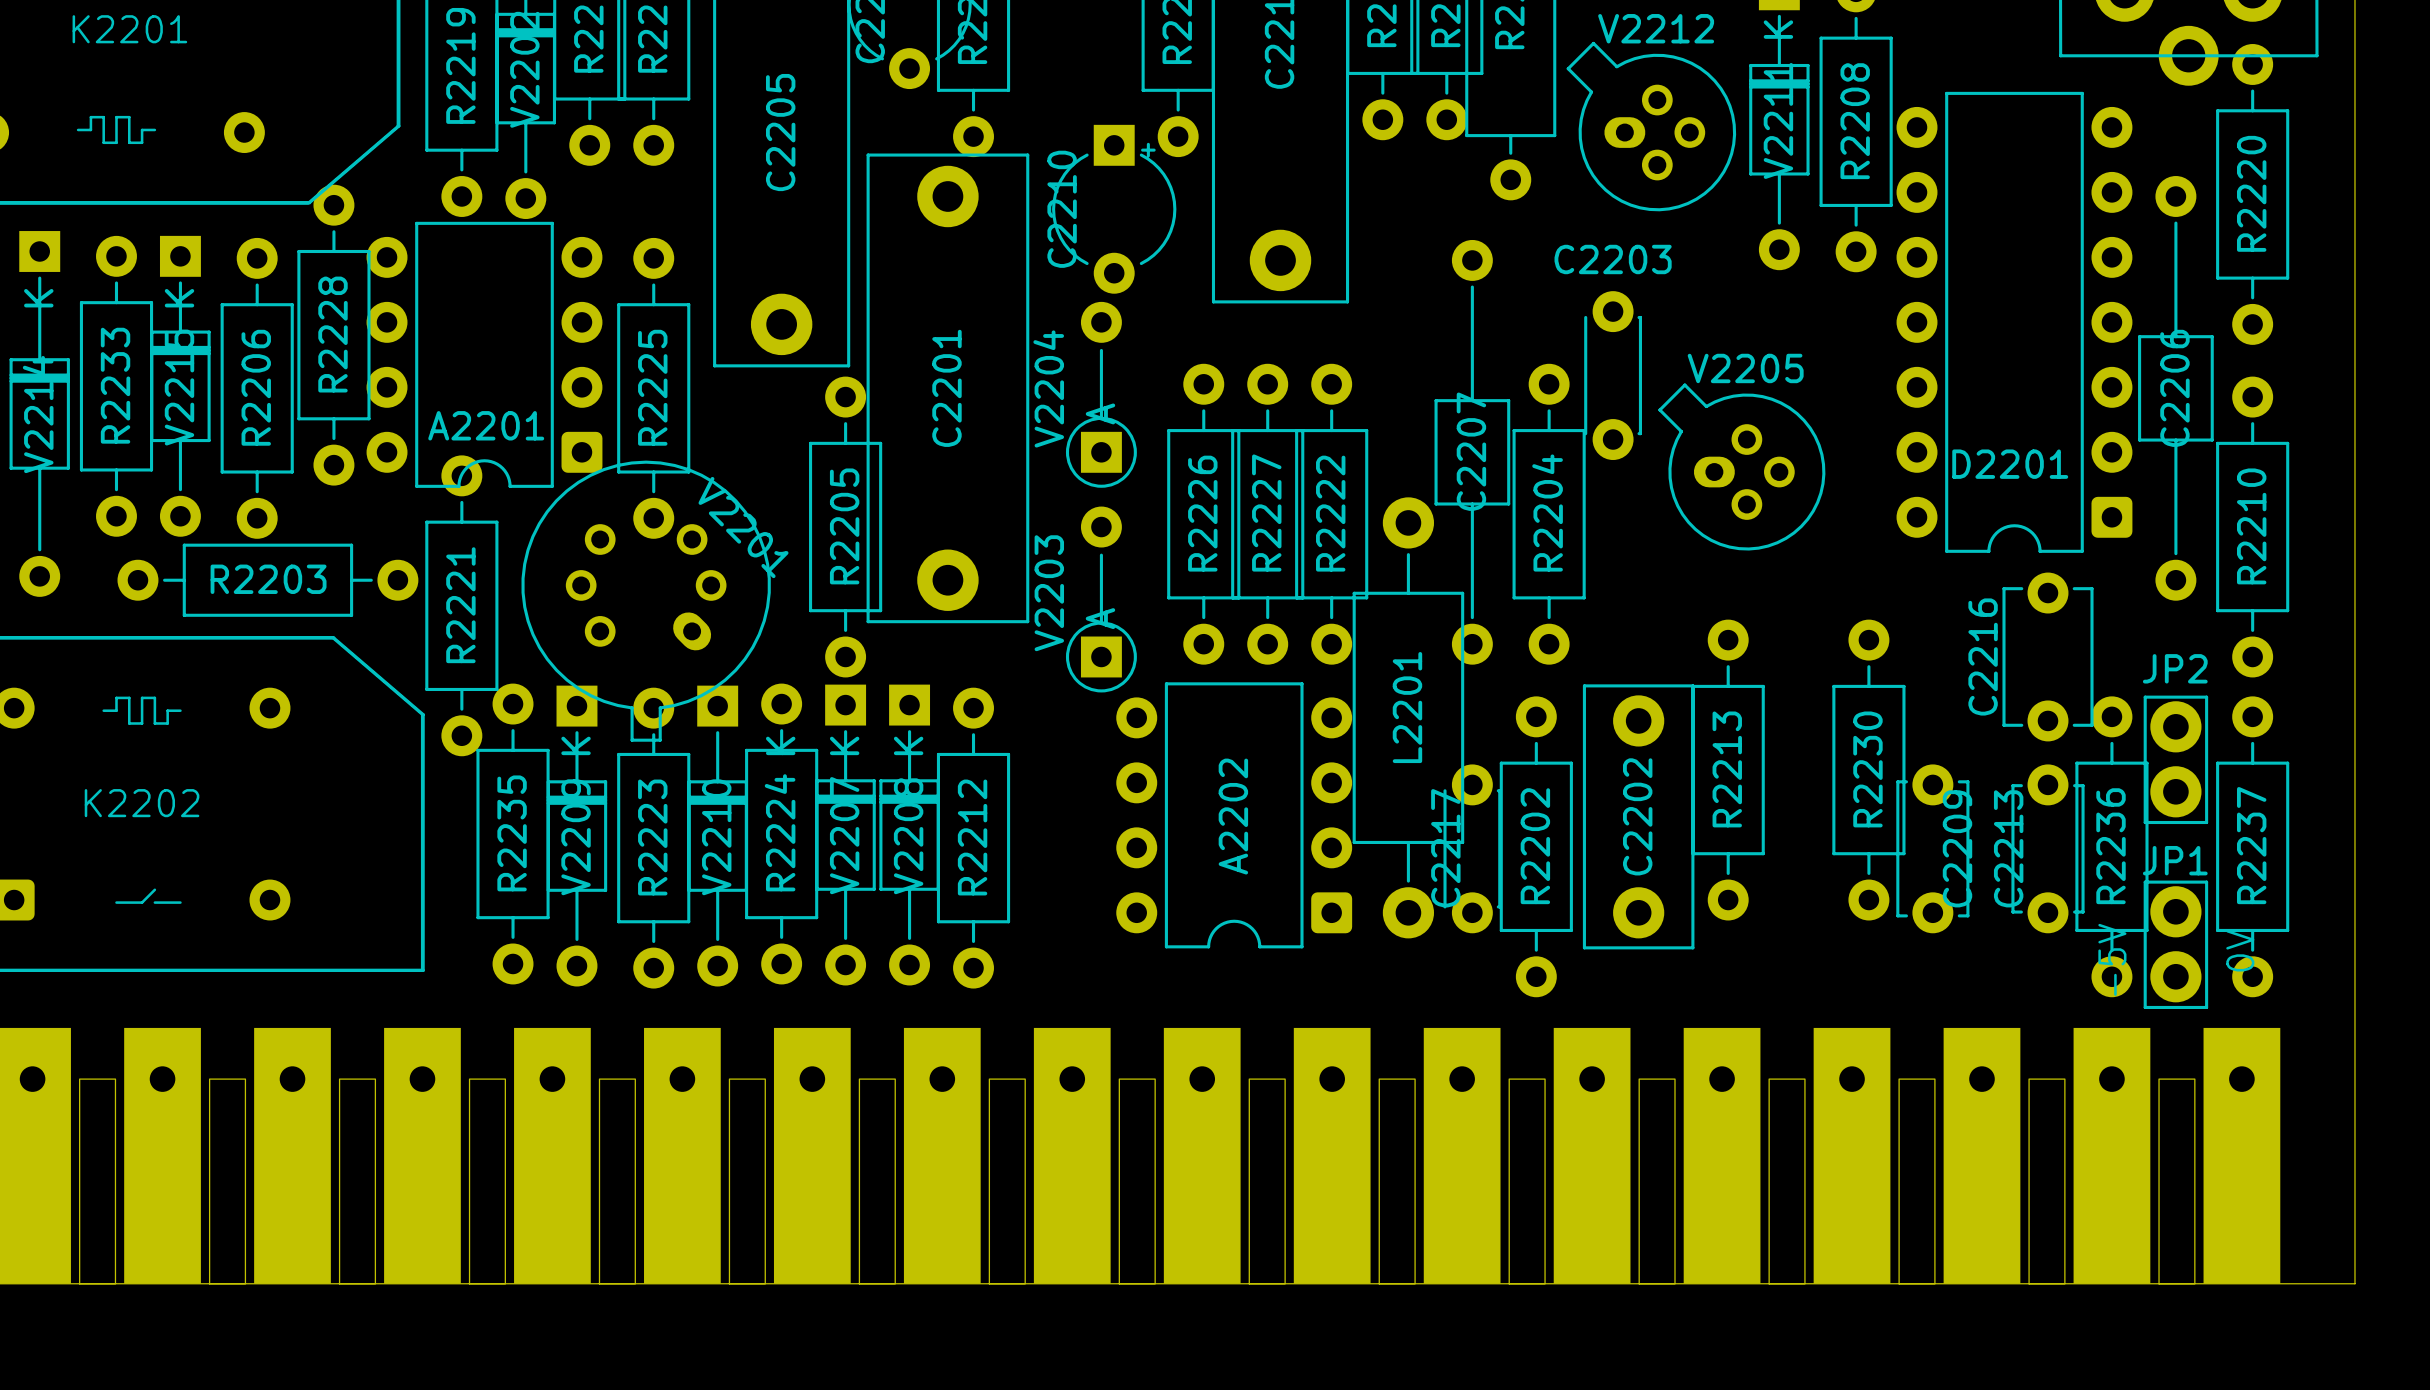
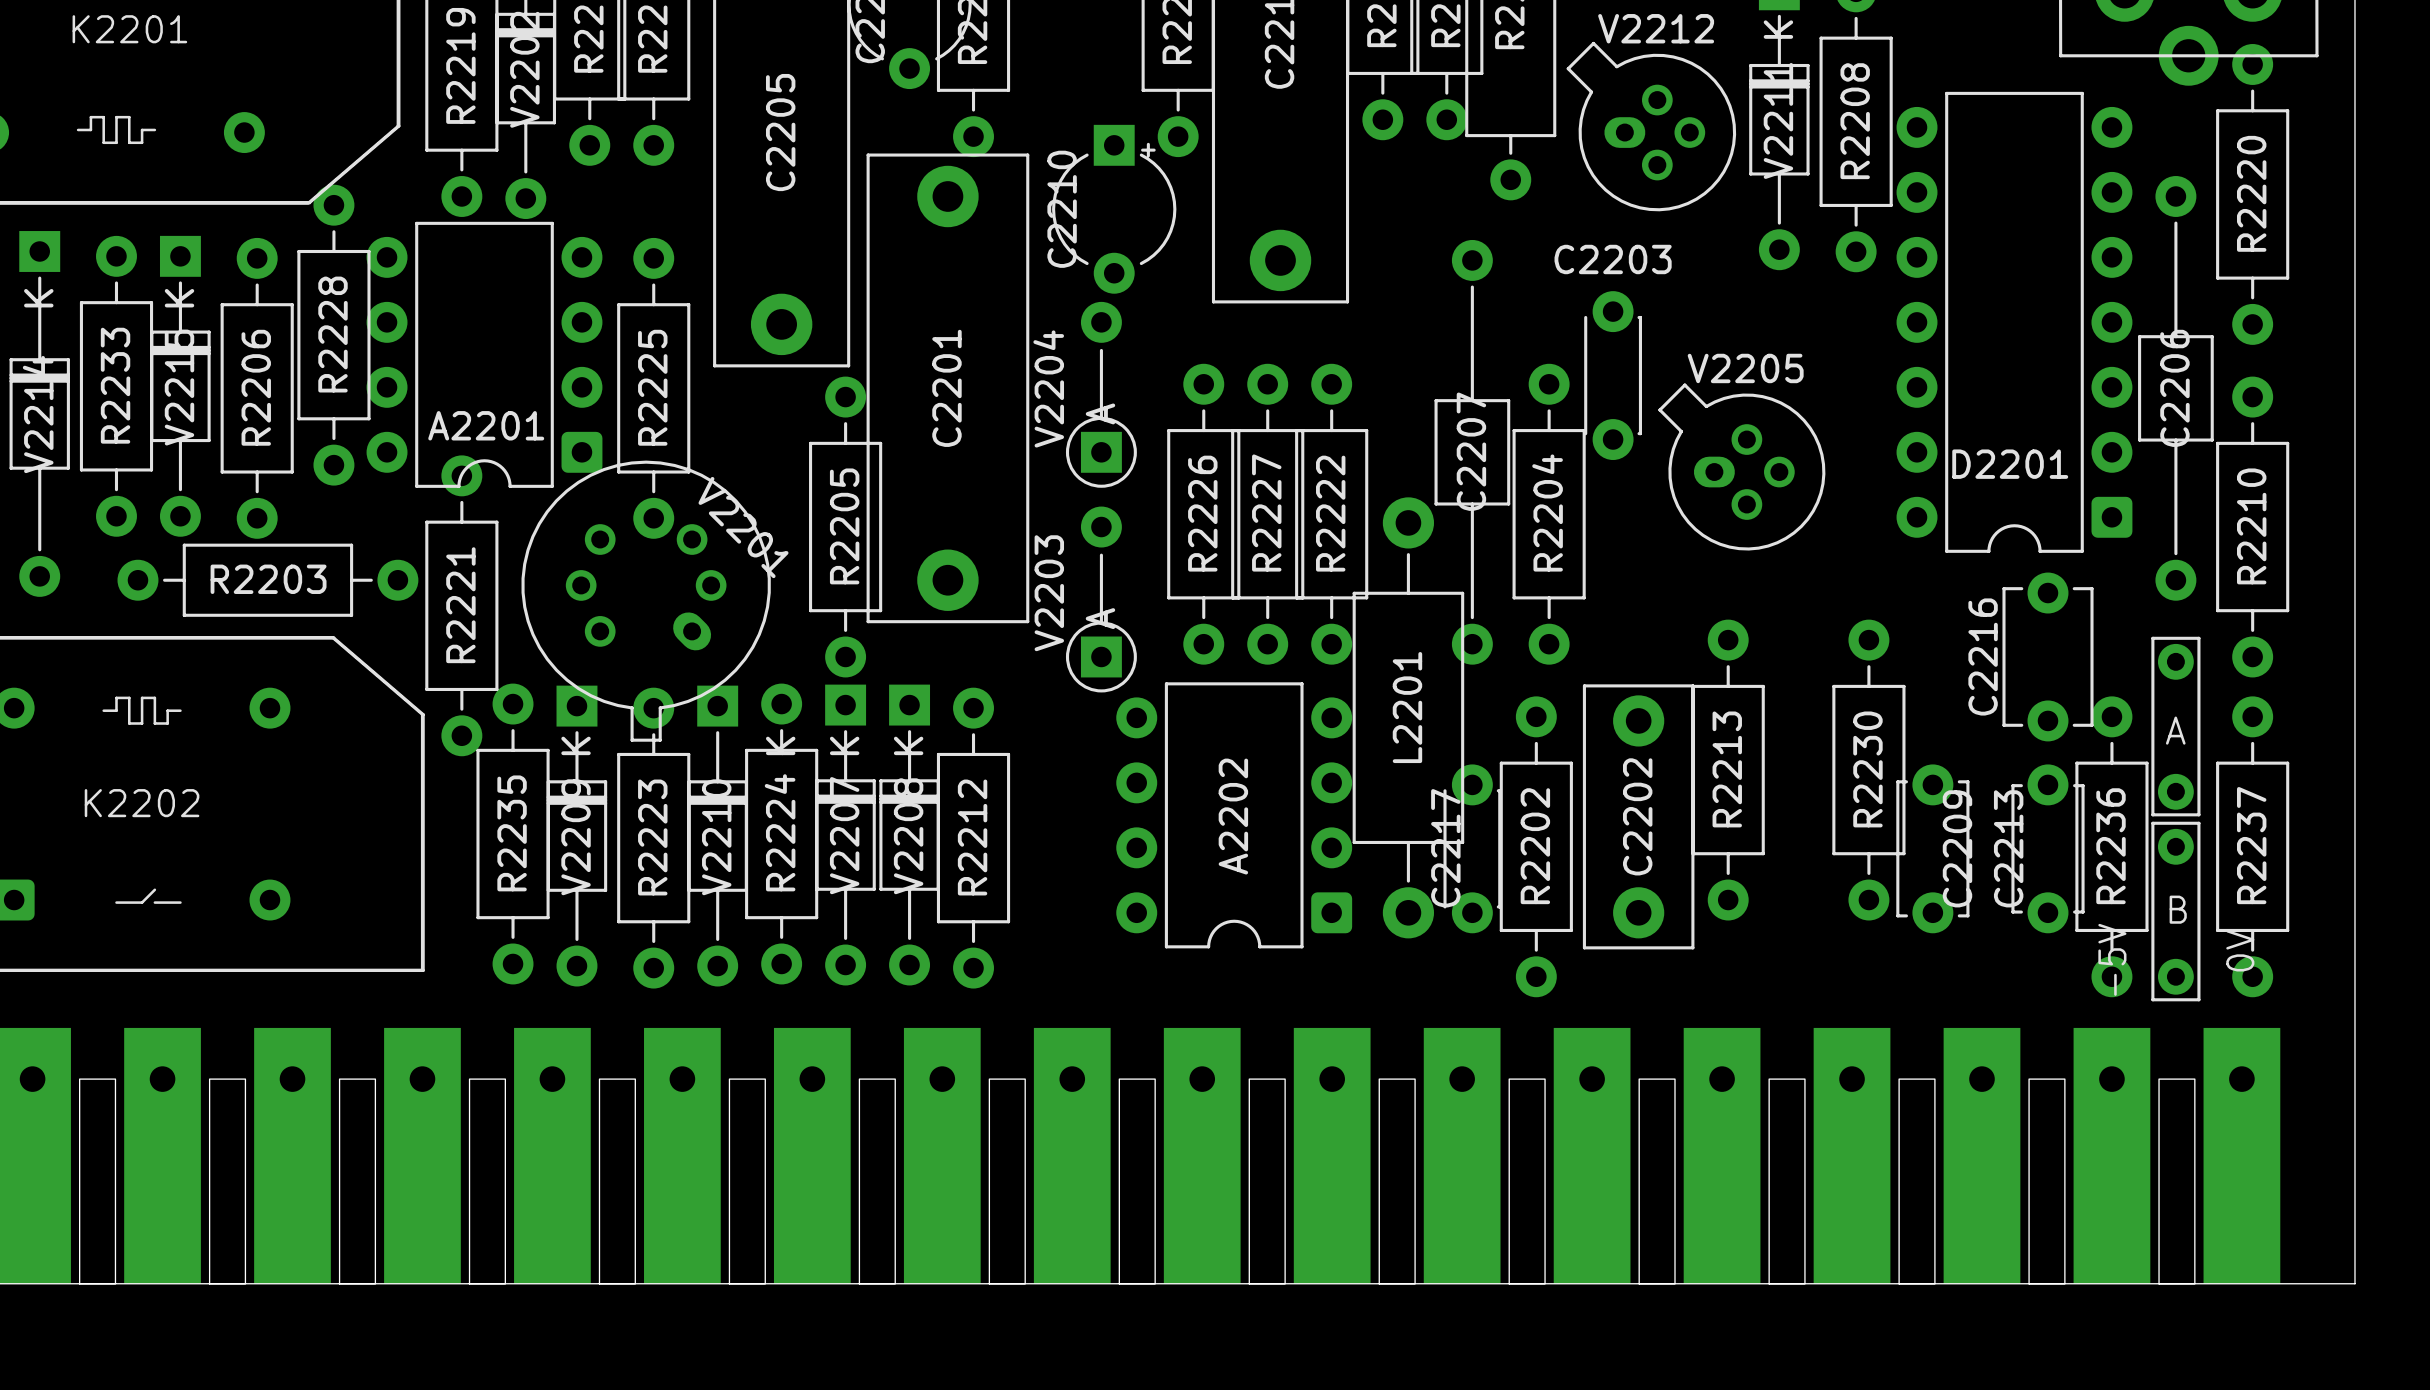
part: none -> (2175, 726)
text: none -> A (2175, 730)
JP2: (2175, 759) -> none
text: none -> B (2178, 909)
part: none -> (2175, 911)
JP1: (2175, 944) -> none

